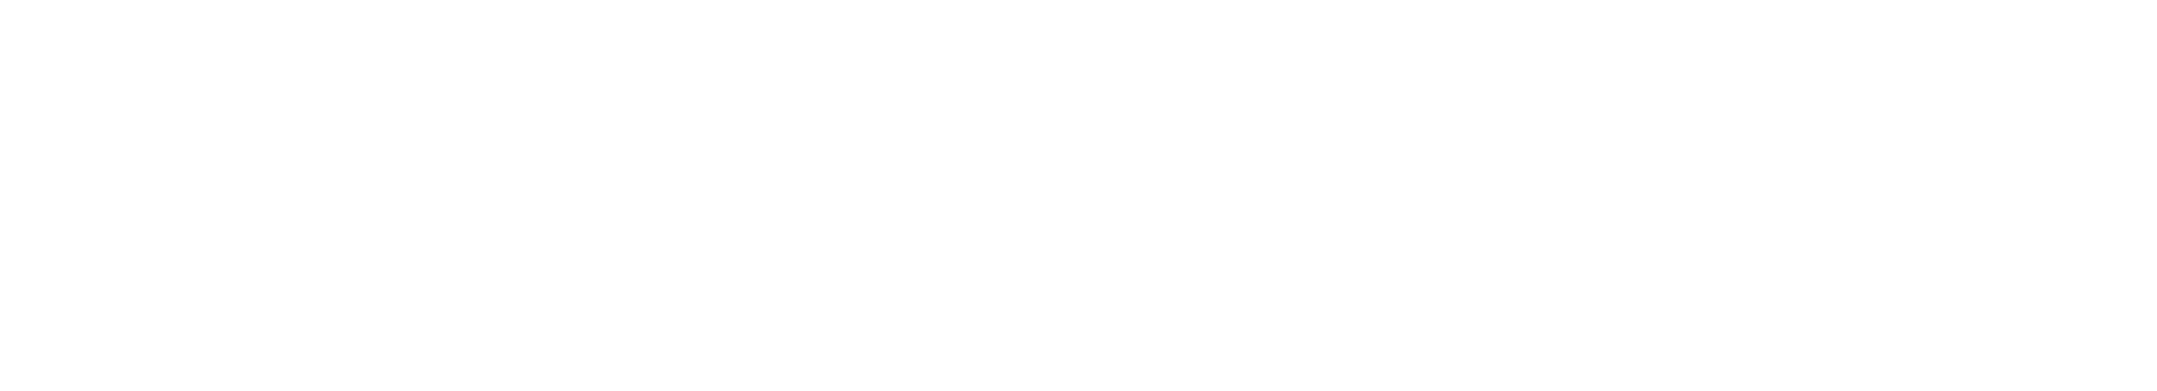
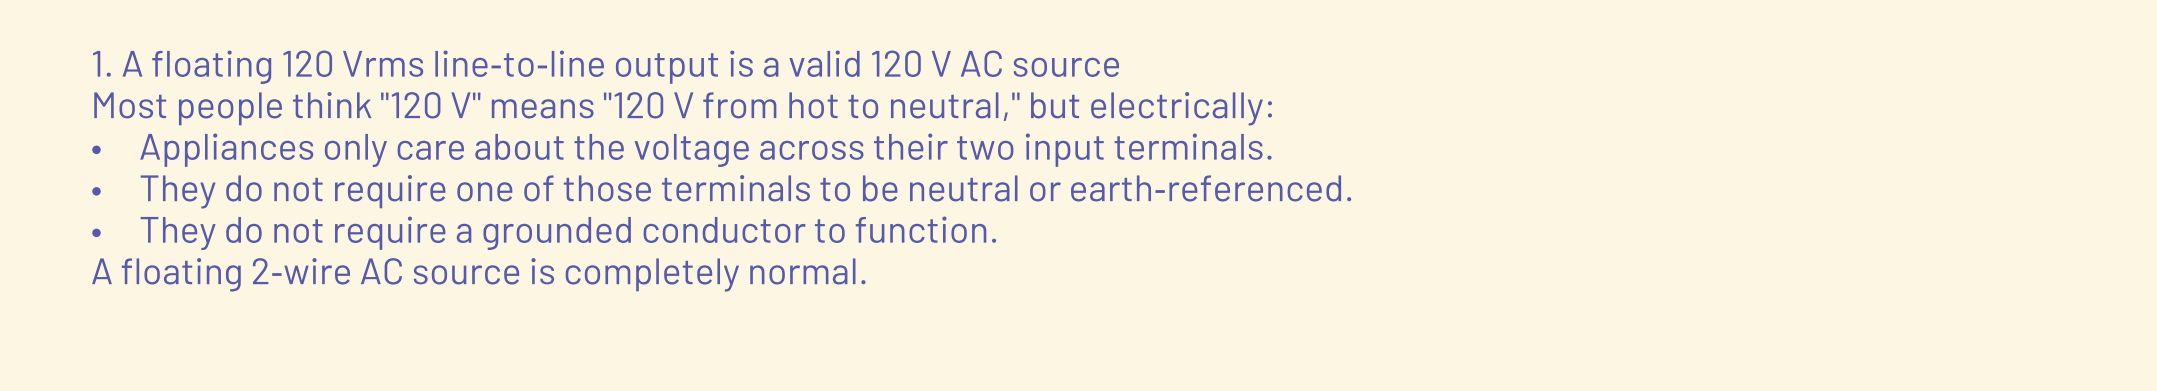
text: none -> 1. A floating 120 Vrms line‑to‑line output is a valid 120 V AC source (606, 67)
text: none -> Most people think "120 V" means "120 V from hot to neutral," but electrically: (683, 108)
text: none -> • Appliances only care about the voltage across their two input terminals. (681, 150)
text: none -> • They do not require one of those terminals to be neutral or earth‑referenced. (721, 191)
text: none -> • They do not require a grounded conductor to function. (544, 233)
text: none -> A floating 2‑wire AC source is completely normal. (478, 274)

